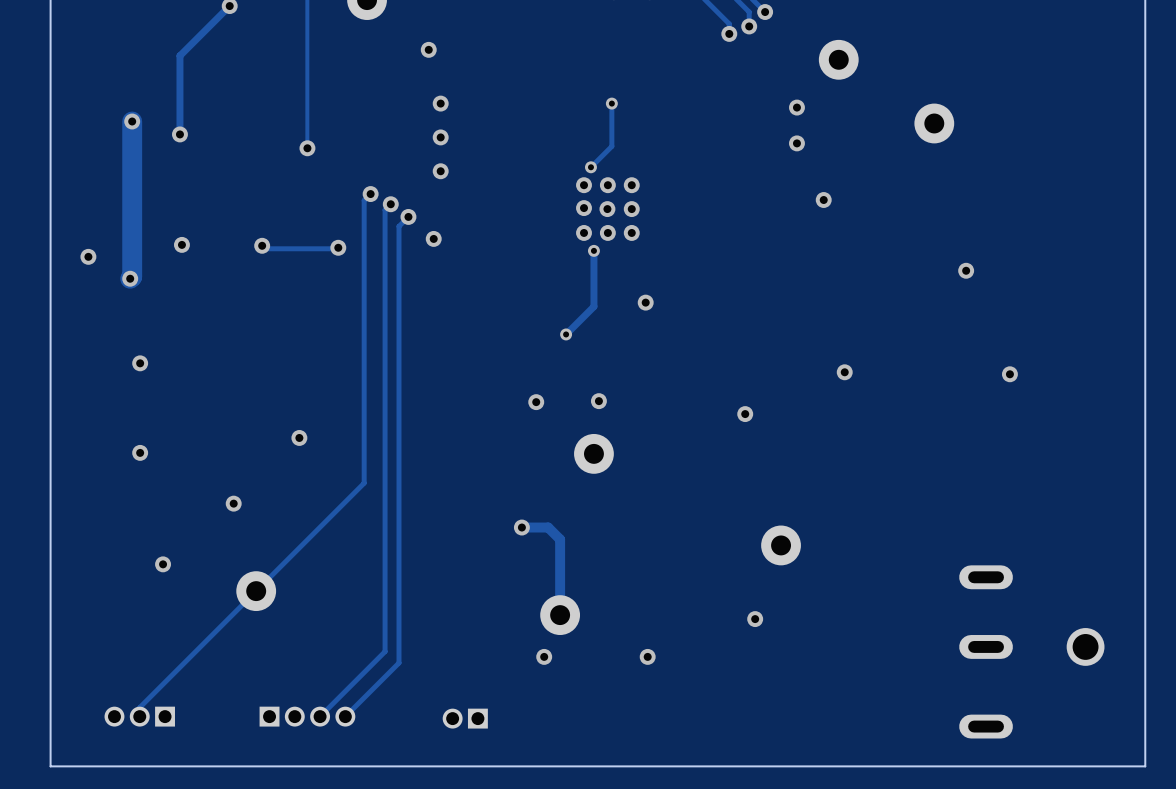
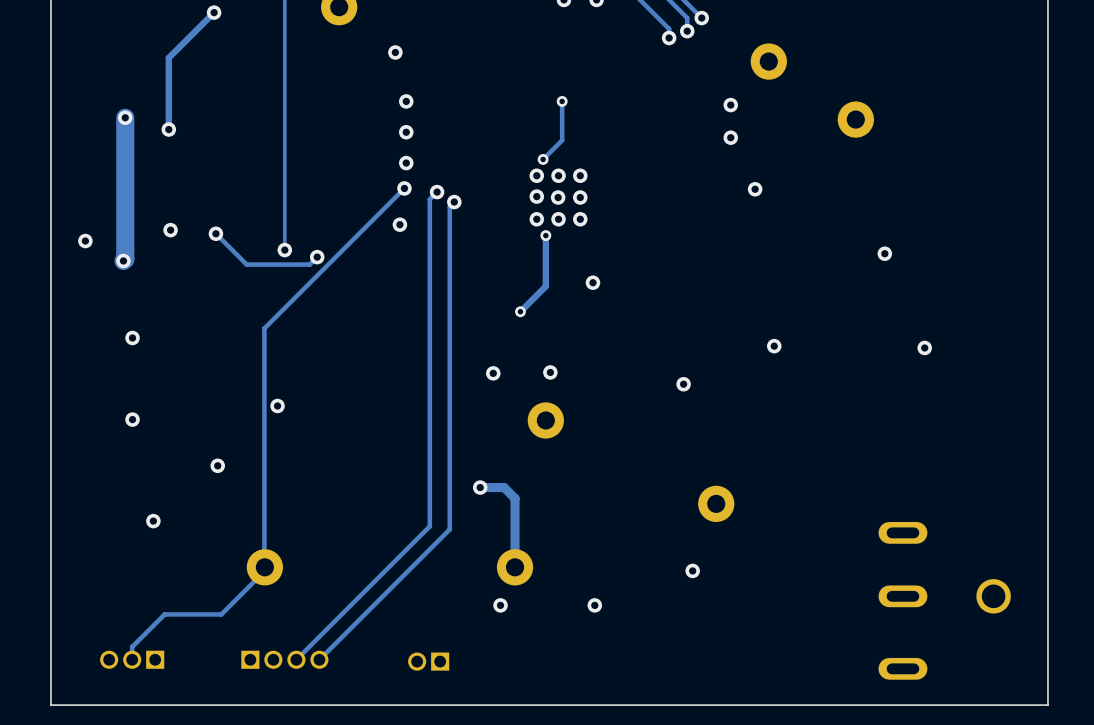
track: none -> (284, 142) (284, 250)
via: (307, 148) -> none
track: (370, 194) (364, 200) (364, 483) (139, 707) -> (404, 188) (264, 328) (264, 571) (221, 614) (164, 614) (132, 646) (132, 651)
via: (370, 194) -> none
via: none -> (404, 188)
via: none -> (437, 192)
track: (390, 204) (385, 209) (385, 651) -> (437, 192) (429, 199) (429, 526) (355, 600)
via: (390, 204) -> none
via: none -> (454, 202)
track: (408, 216) (399, 226) (399, 662) -> (454, 202) (449, 206) (449, 529) (368, 610)
via: (408, 216) -> none
track: (262, 245) (265, 248) (338, 247) -> none
via: (262, 245) -> none
via: (338, 247) -> none
track: none -> (215, 233) (246, 264) (309, 264) (317, 257)
via: none -> (215, 233)
via: none -> (284, 250)
via: none -> (317, 257)
part position: (256, 591) -> (264, 567)

